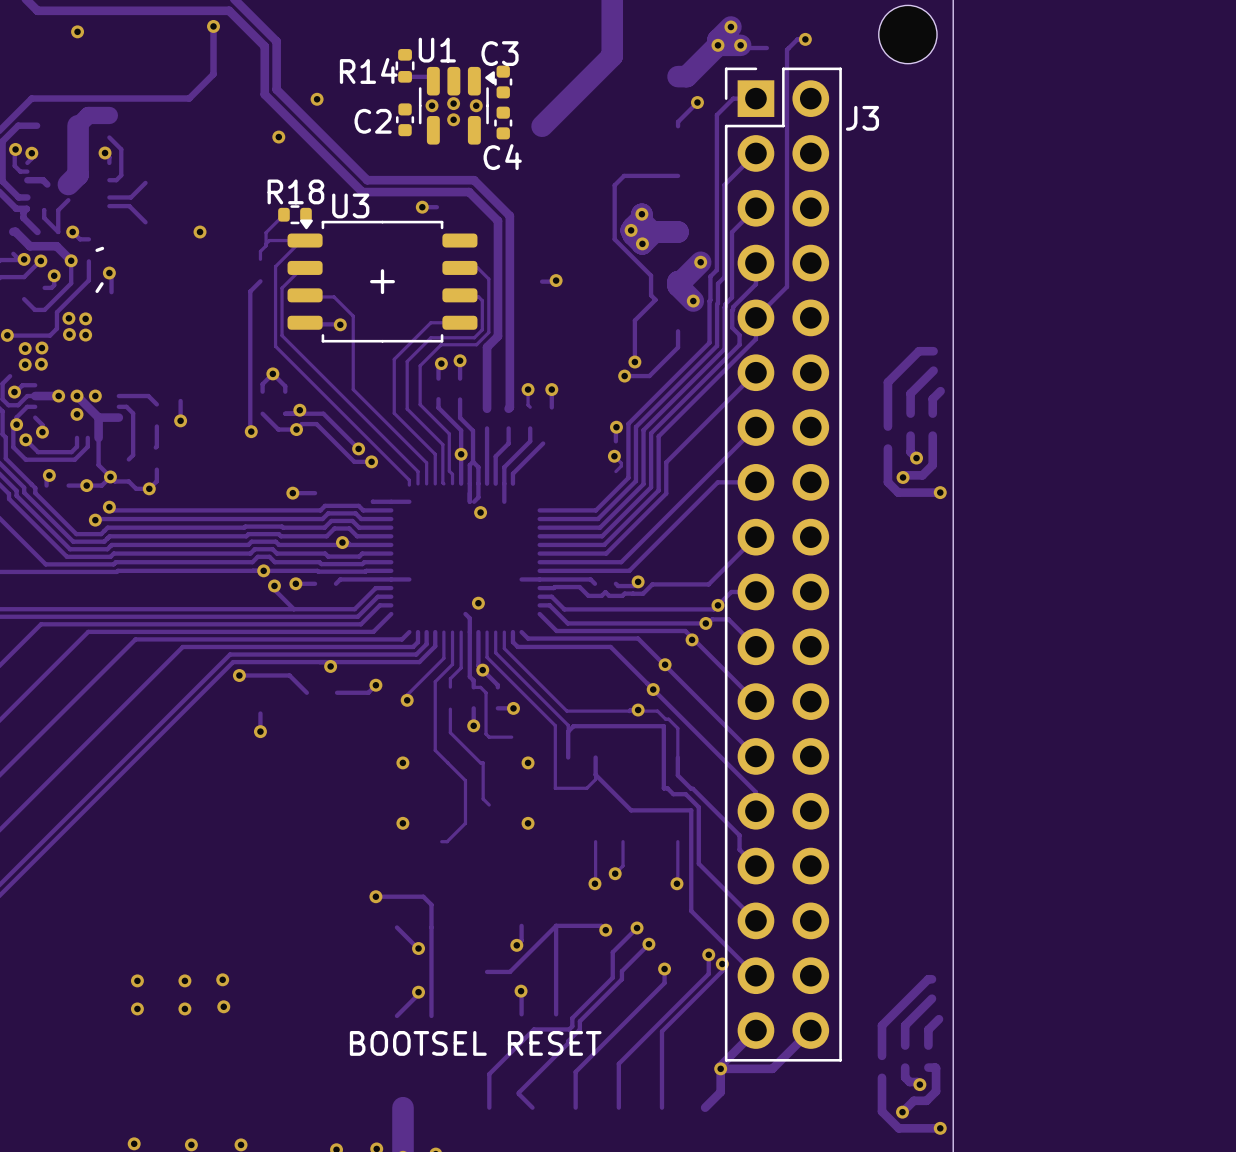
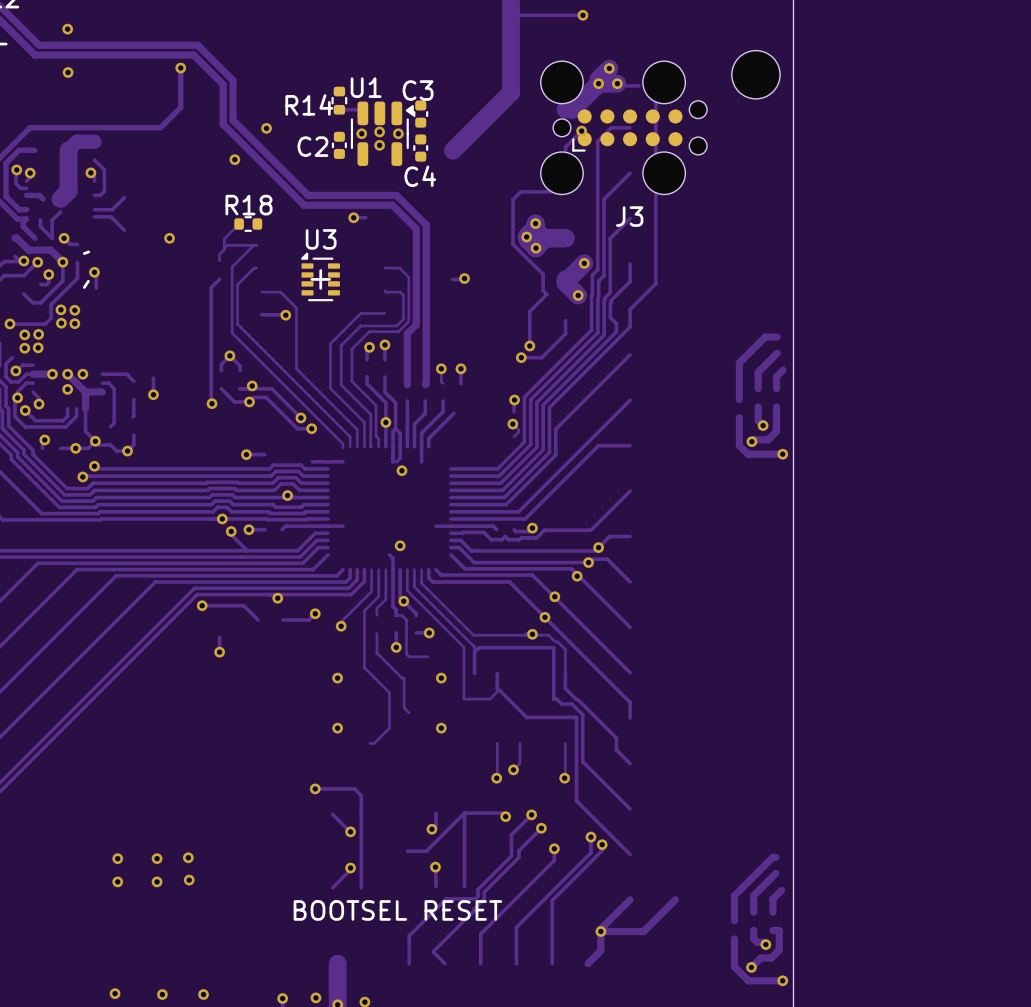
J3 footprint: [724, 67, 842, 1062] -> [540, 61, 708, 195]
J3 name position: J3 (862, 118) -> J3 (629, 216)
U3 name position: U3 (350, 205) -> U3 (321, 239)
U3 footprint: [287, 219, 478, 343] -> [301, 252, 340, 302]

